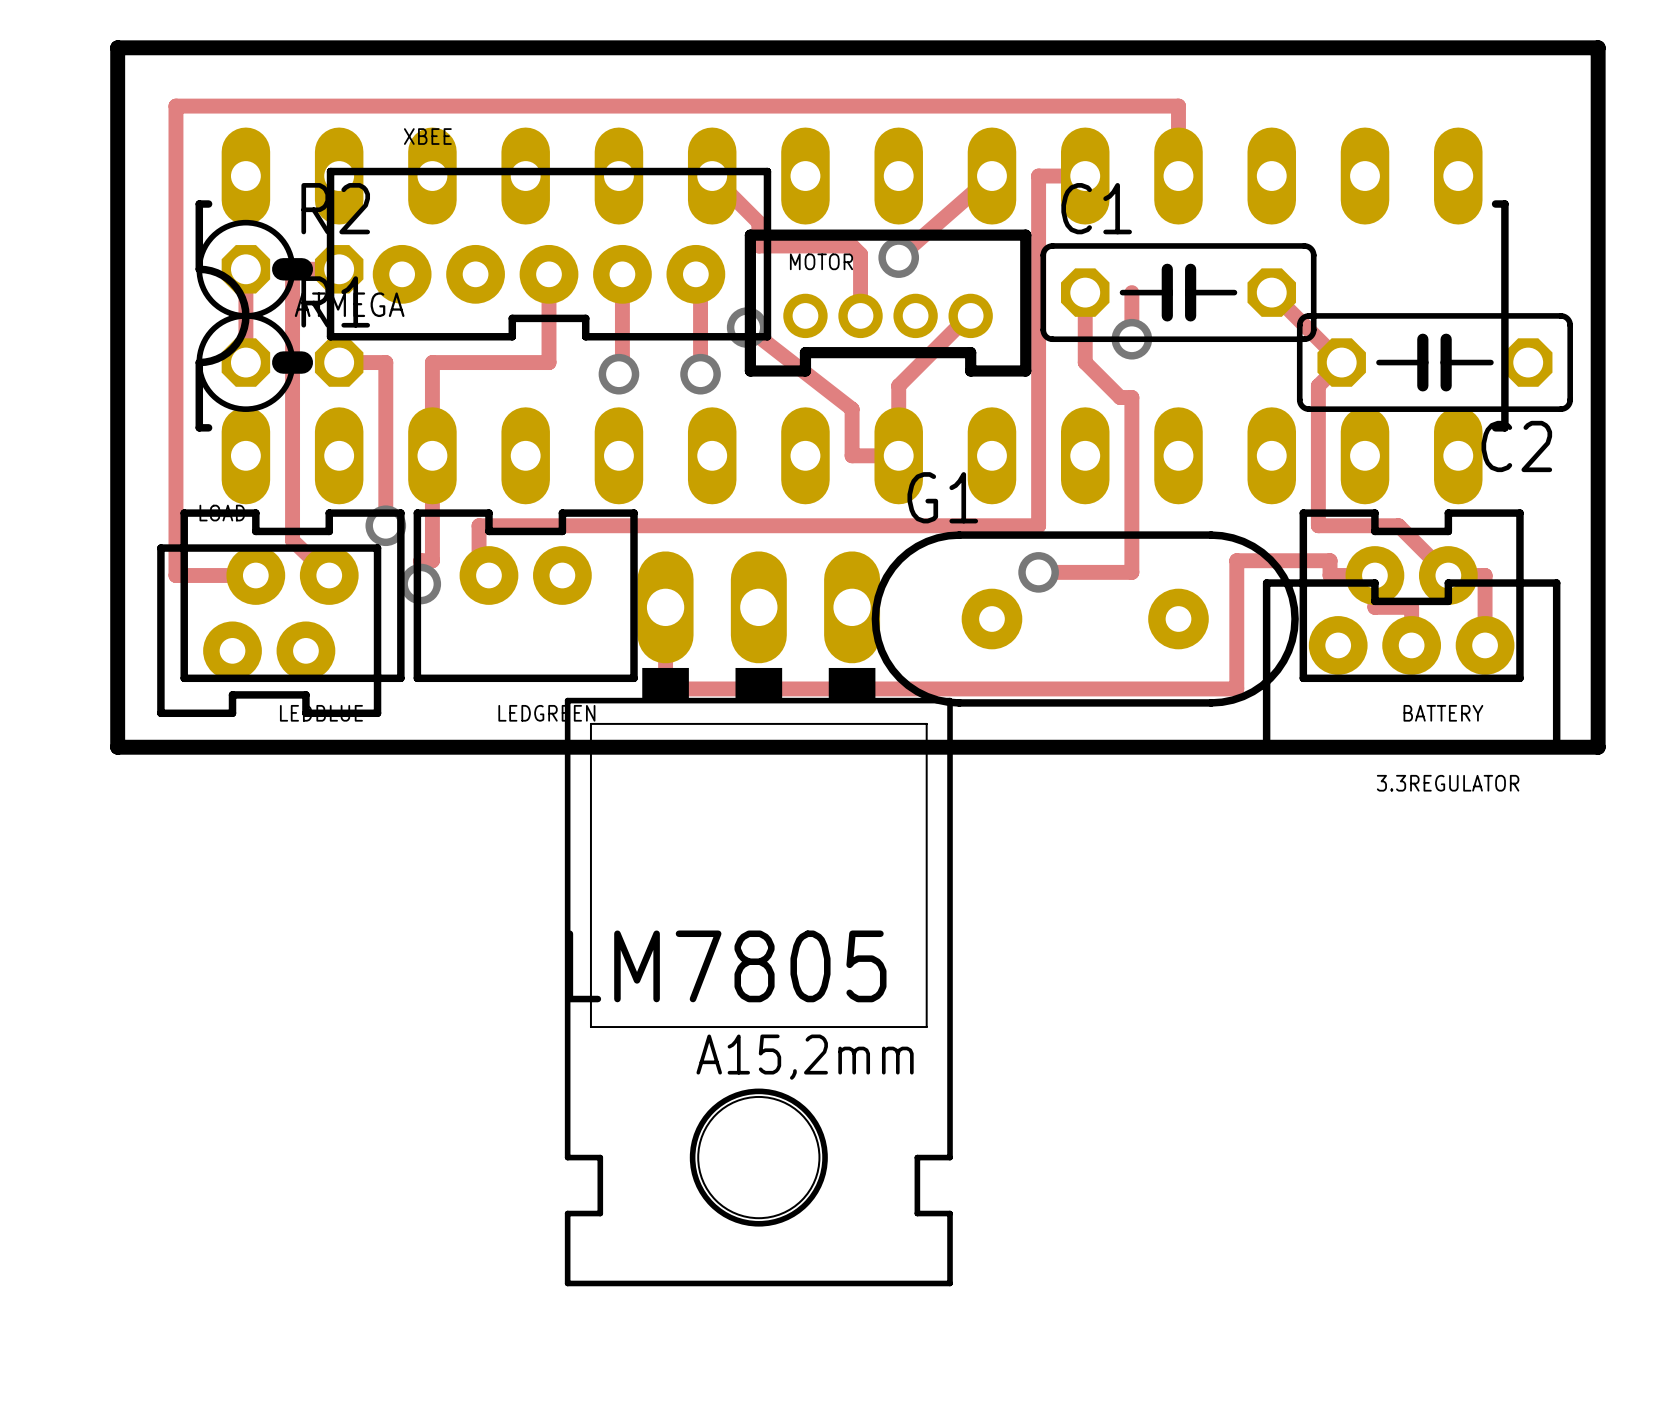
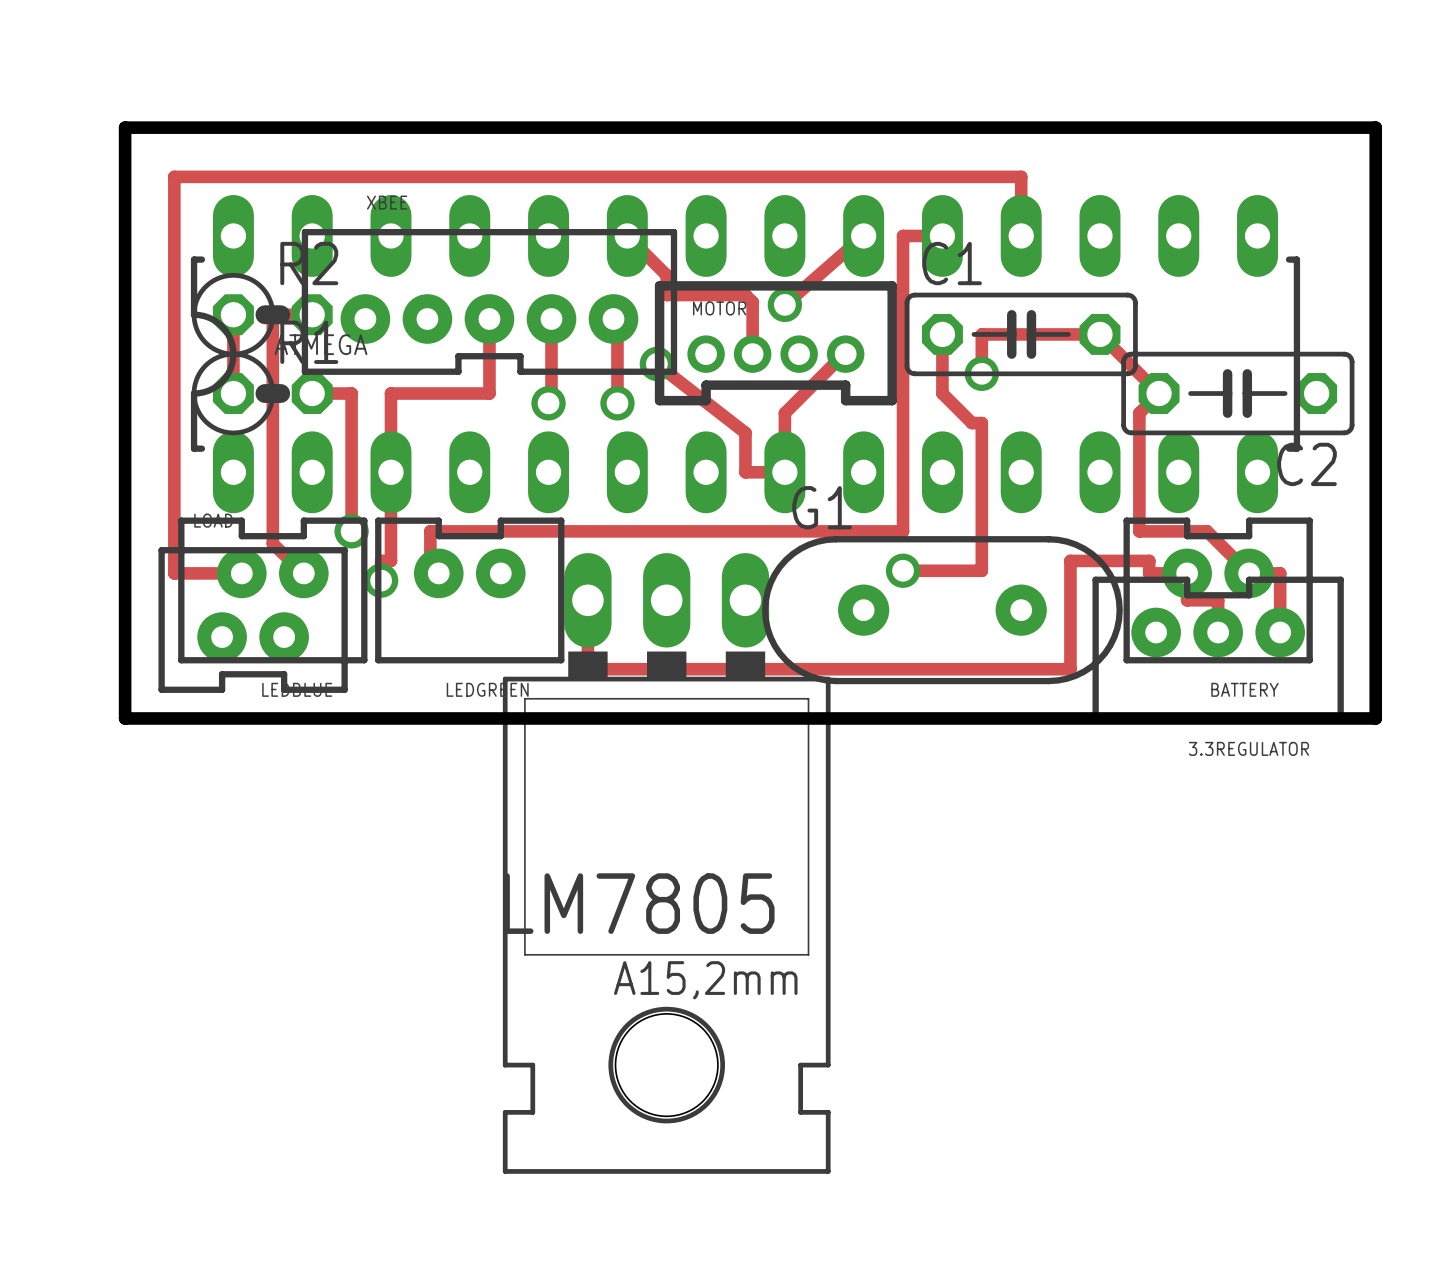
track: none -> (981, 334) (1099, 334)

